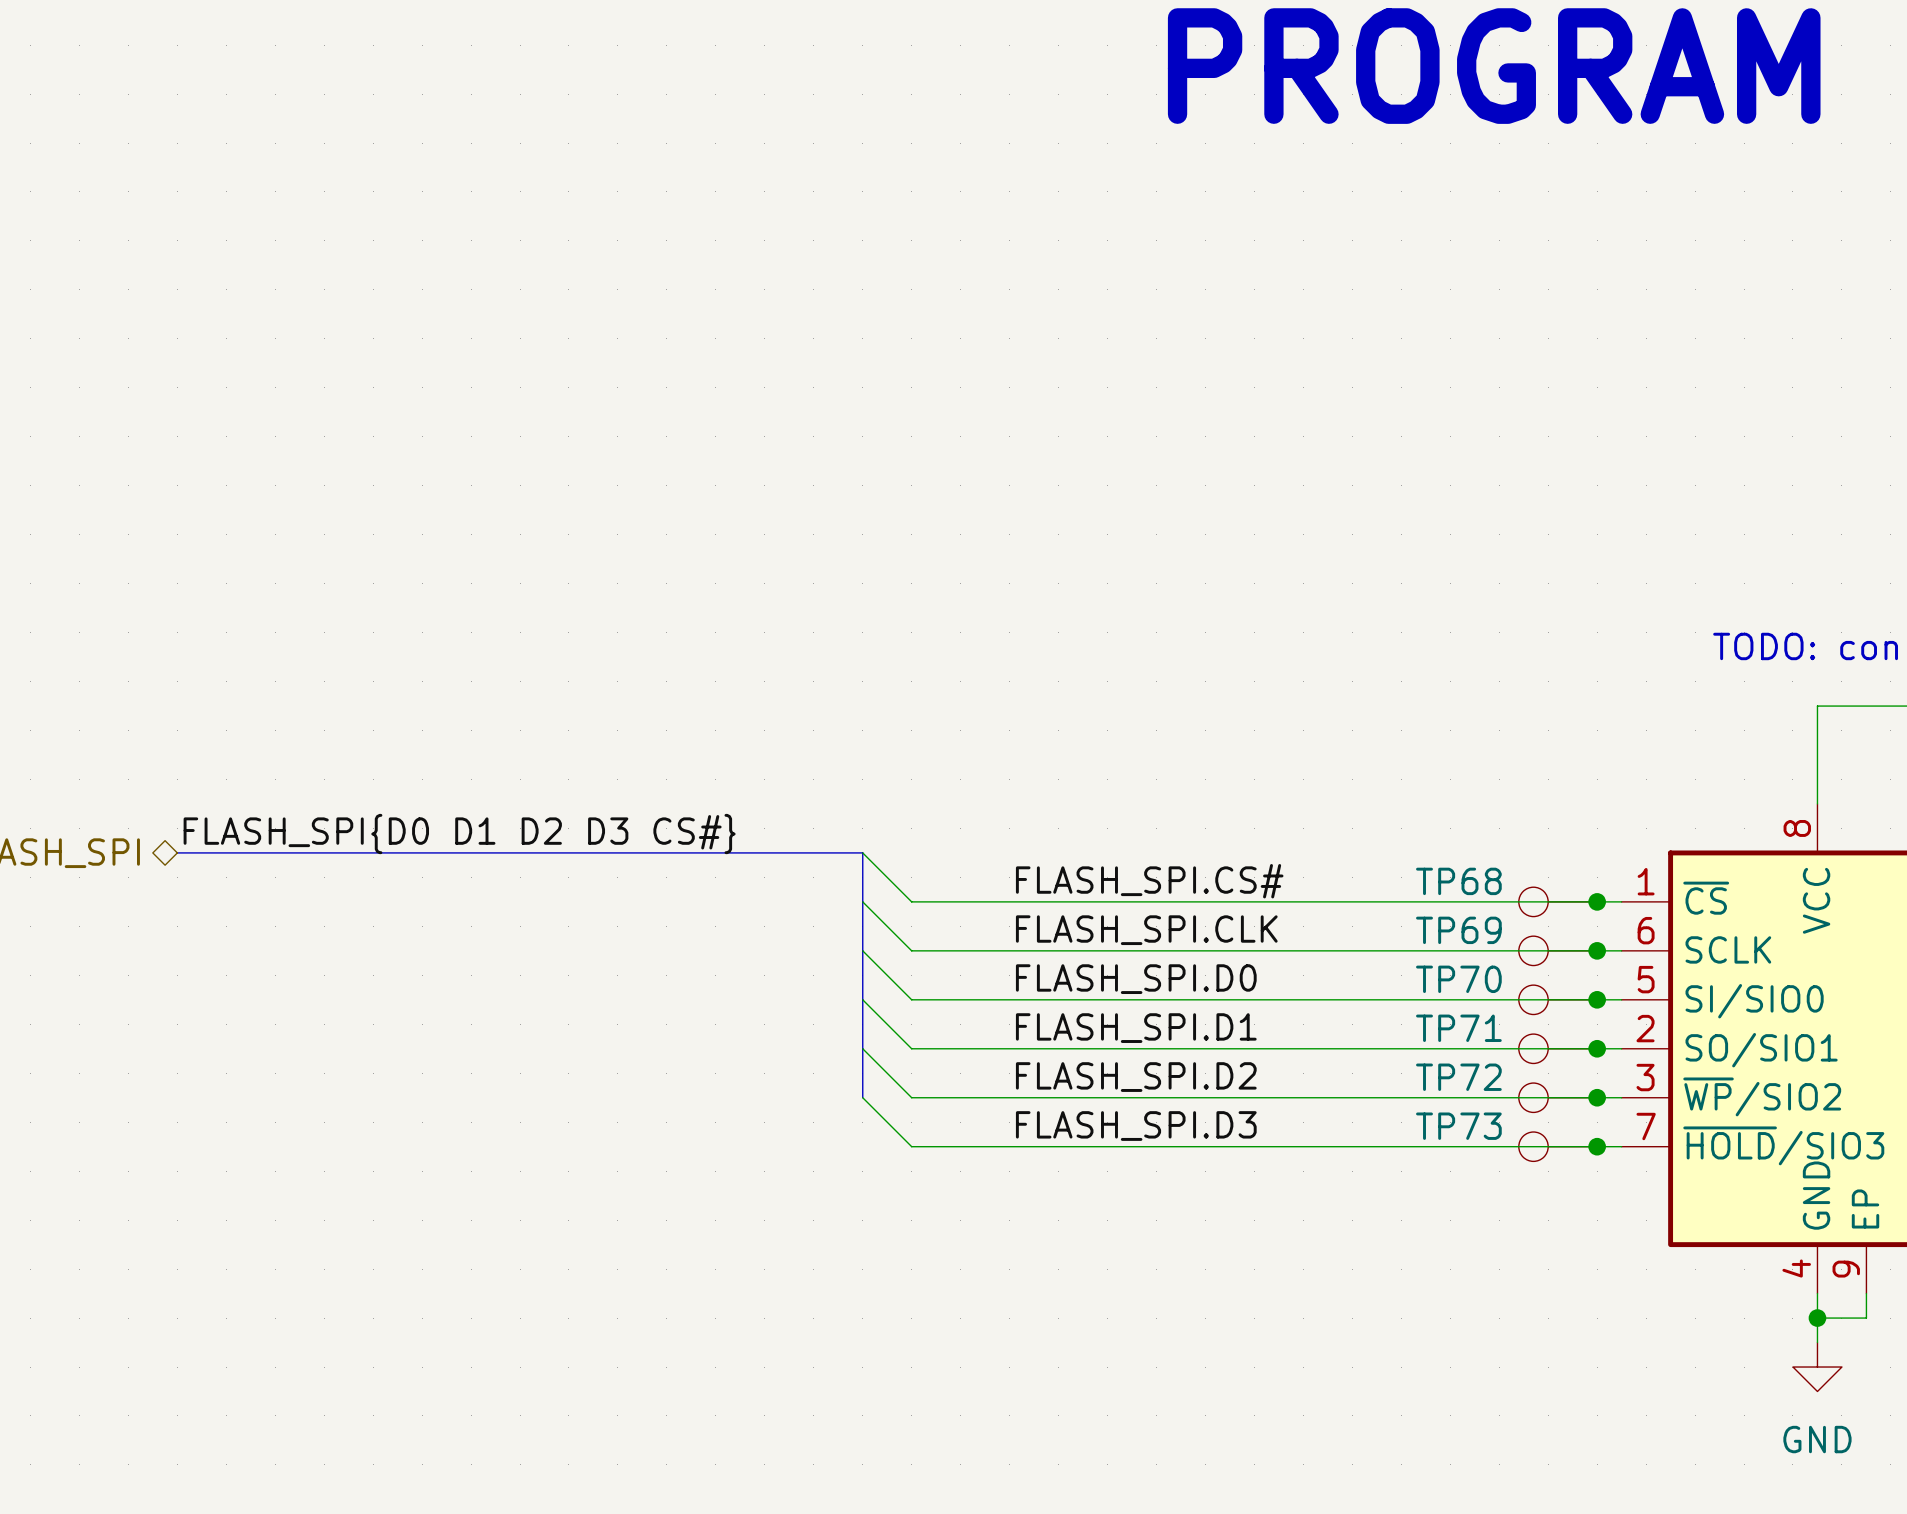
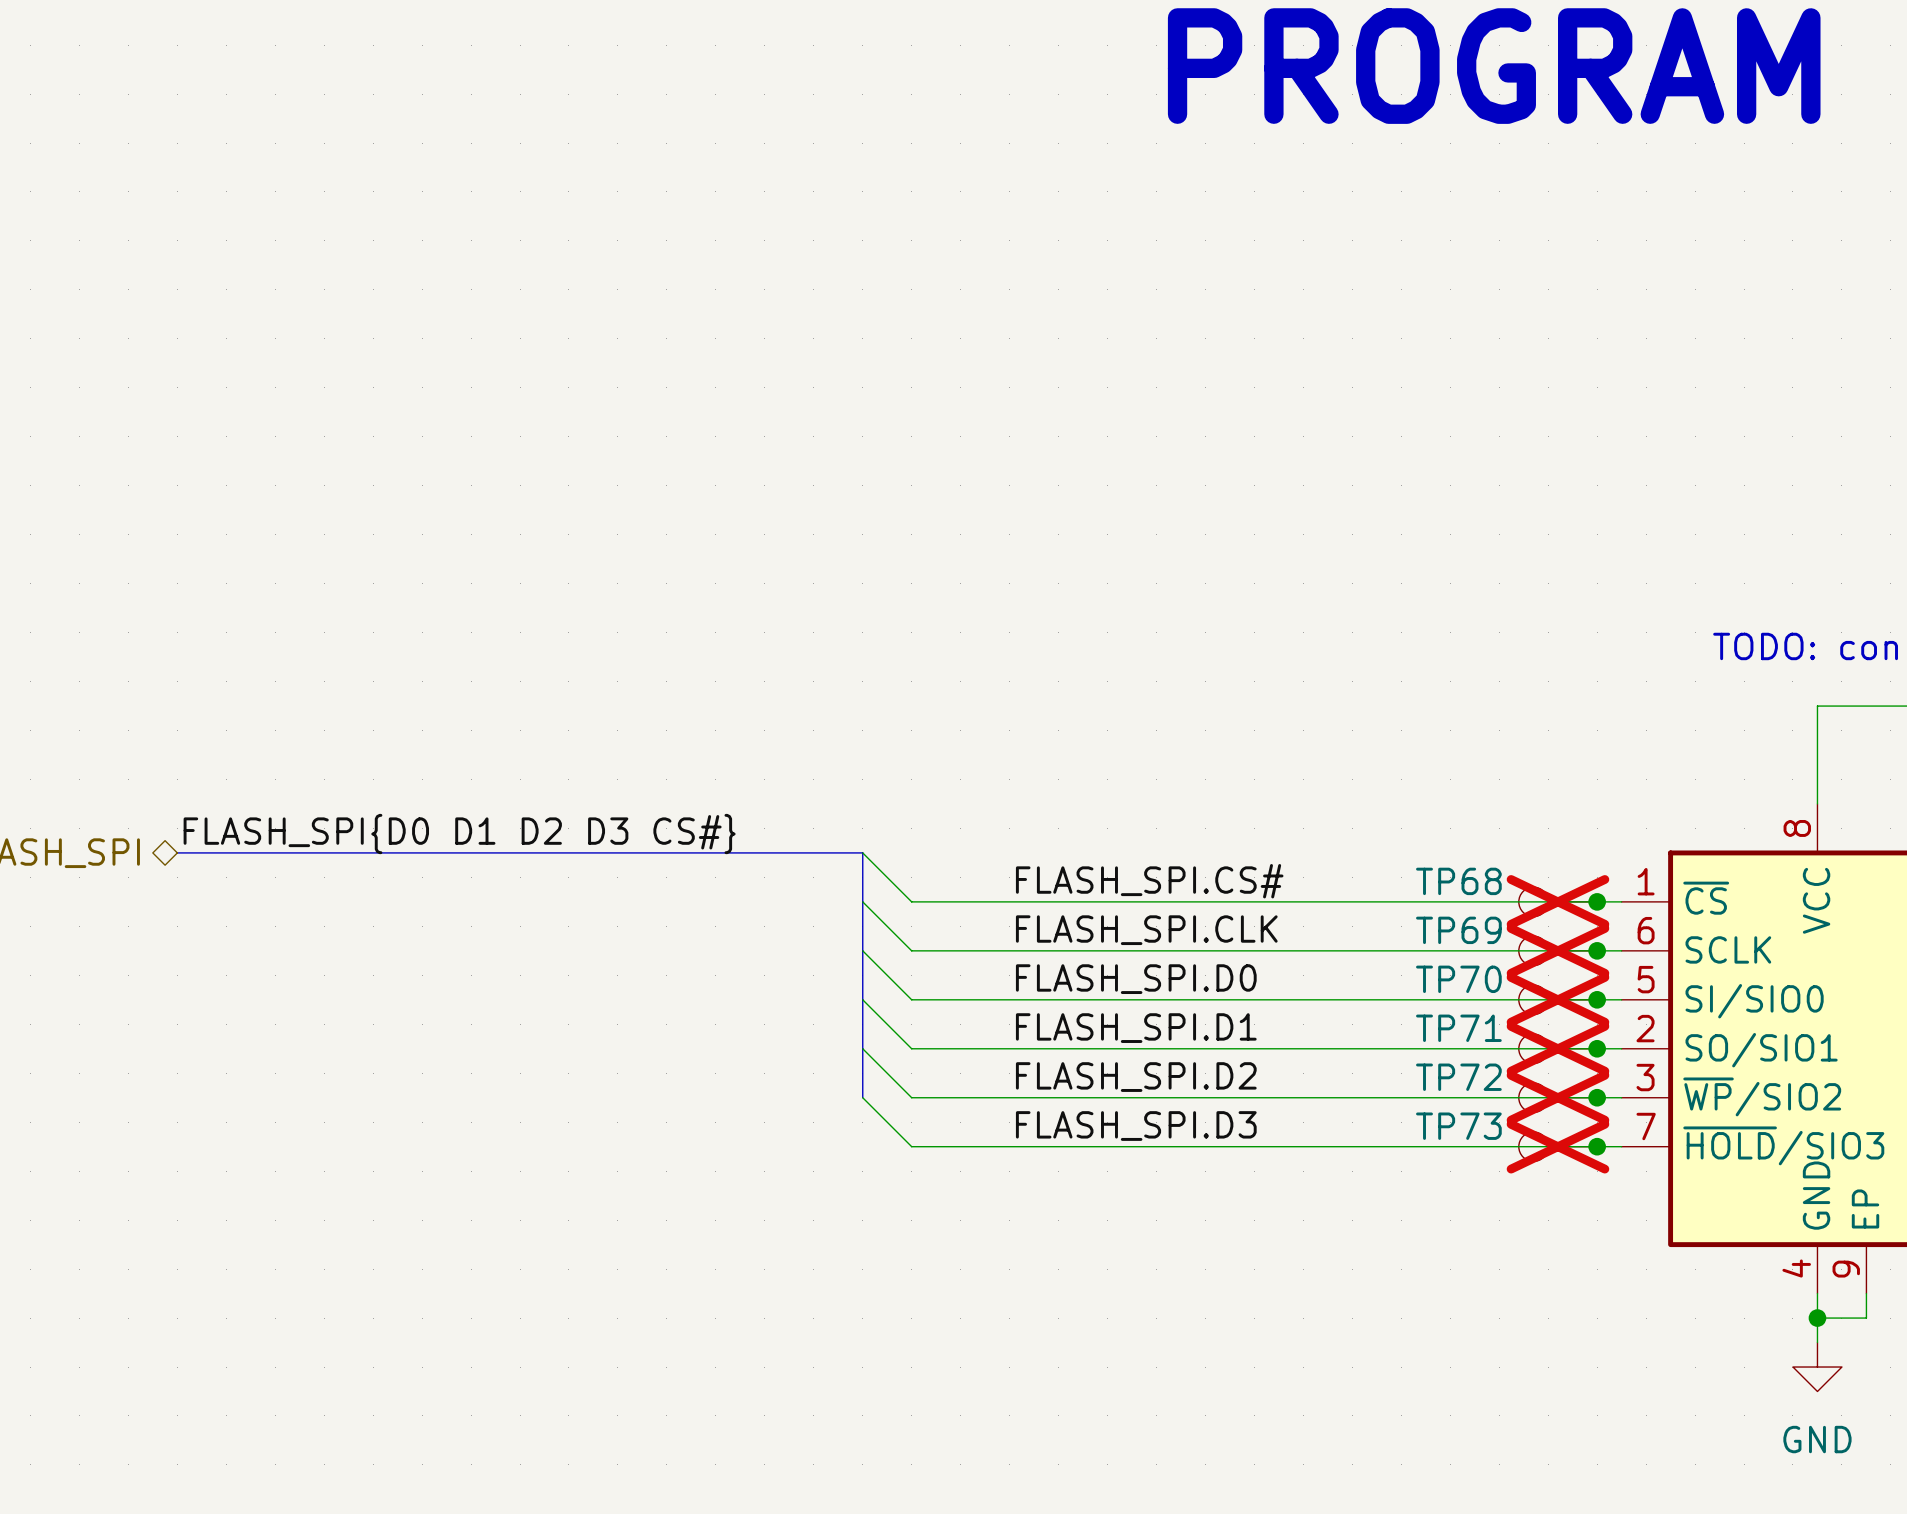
TP68 do-not-place cross: none -> (1557, 901)
TP69 do-not-place cross: none -> (1557, 950)
TP70 do-not-place cross: none -> (1557, 999)
TP71 do-not-place cross: none -> (1557, 1048)
TP72 do-not-place cross: none -> (1557, 1097)
TP73 do-not-place cross: none -> (1557, 1146)

